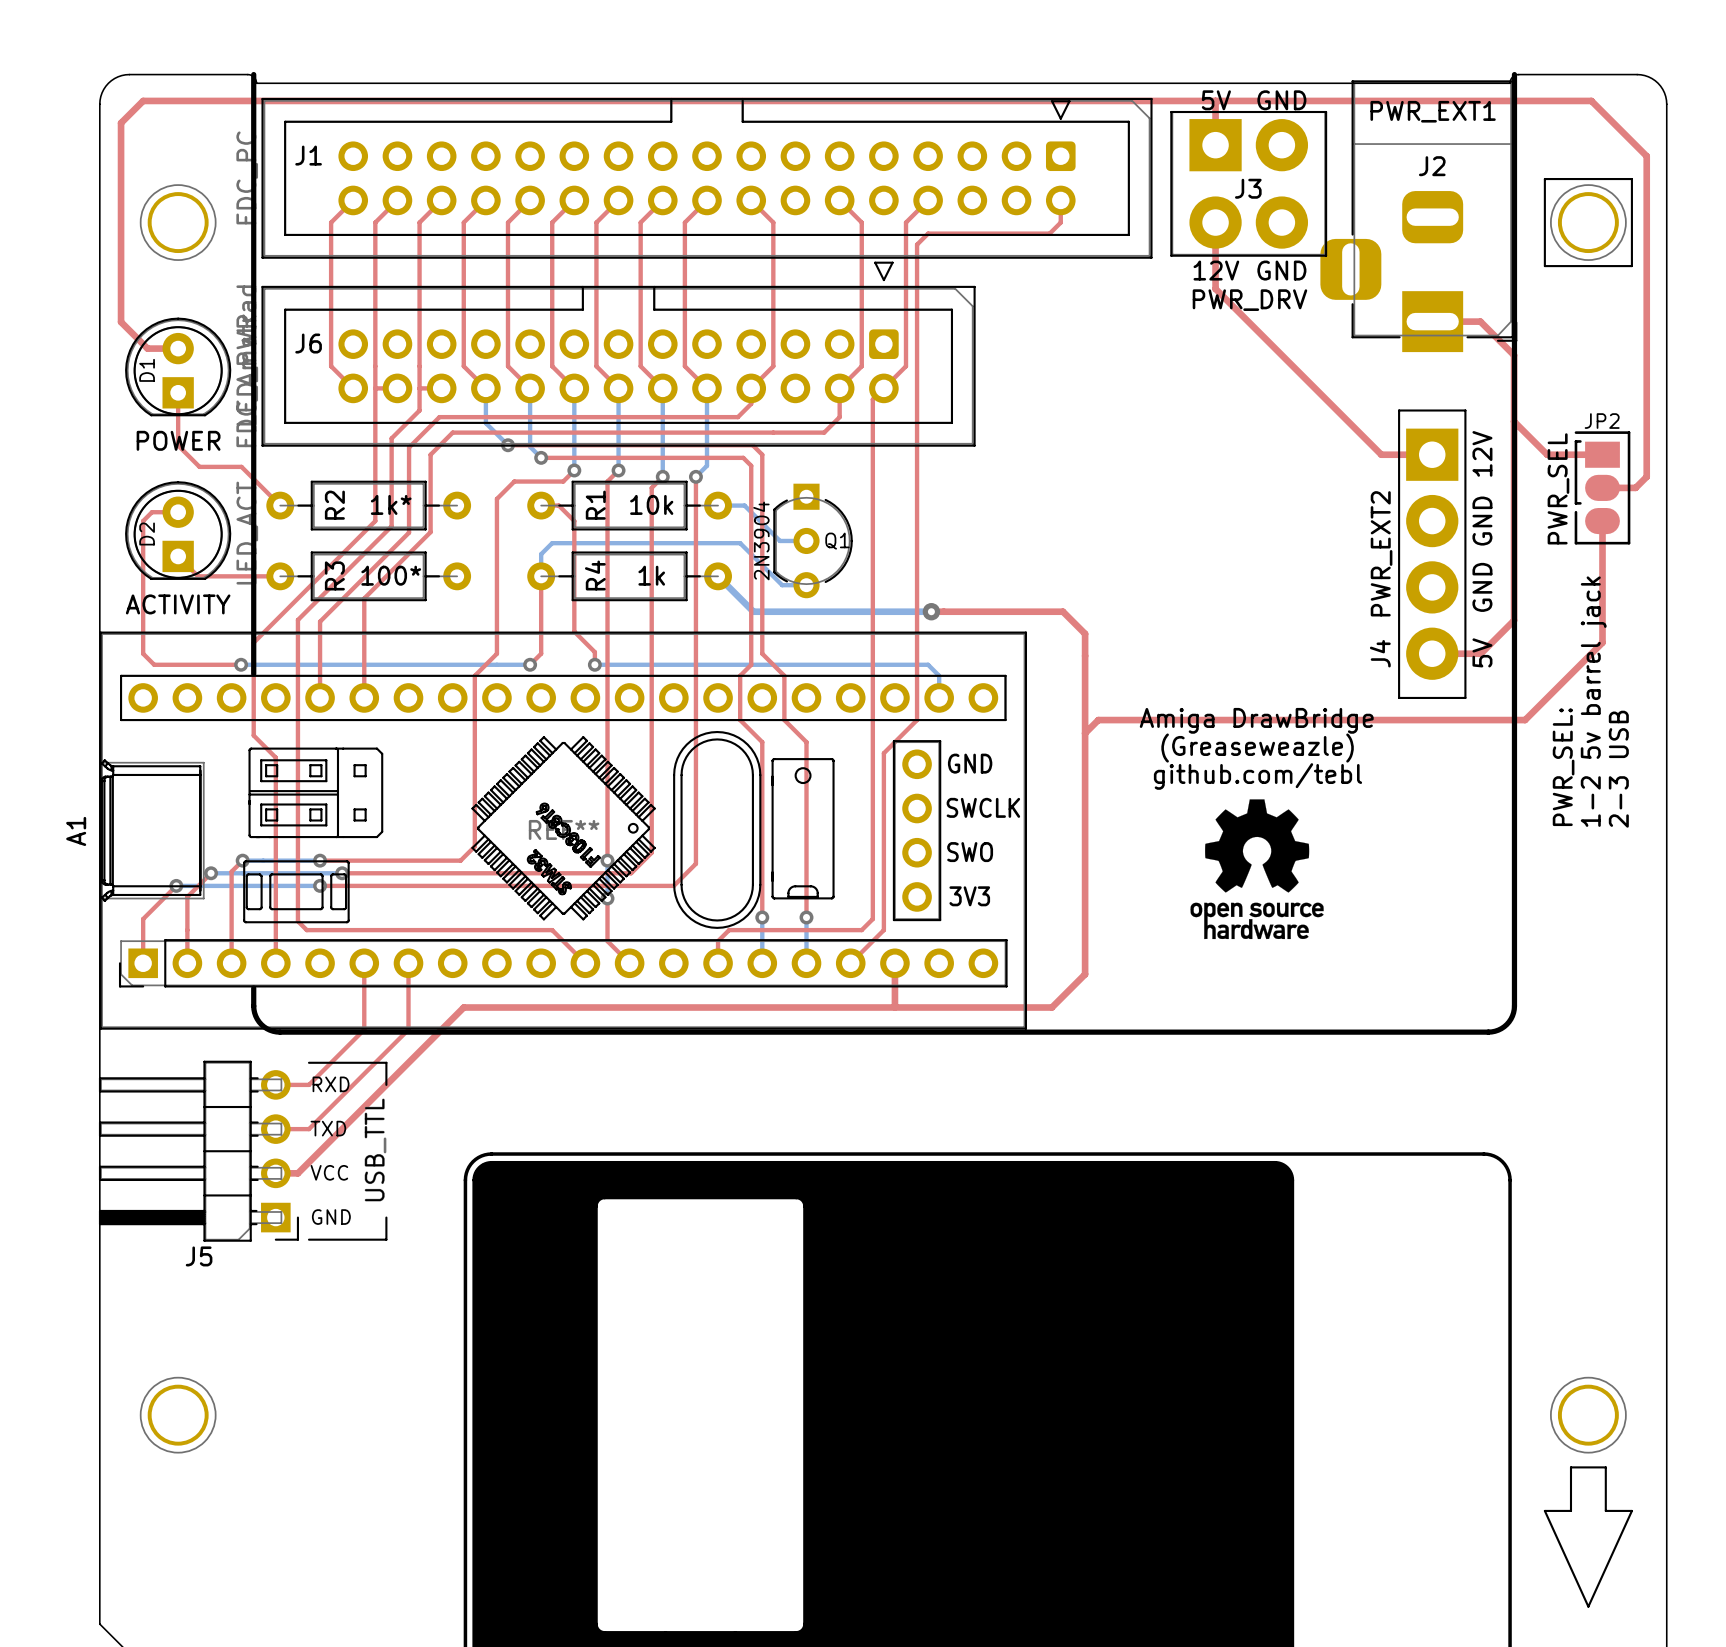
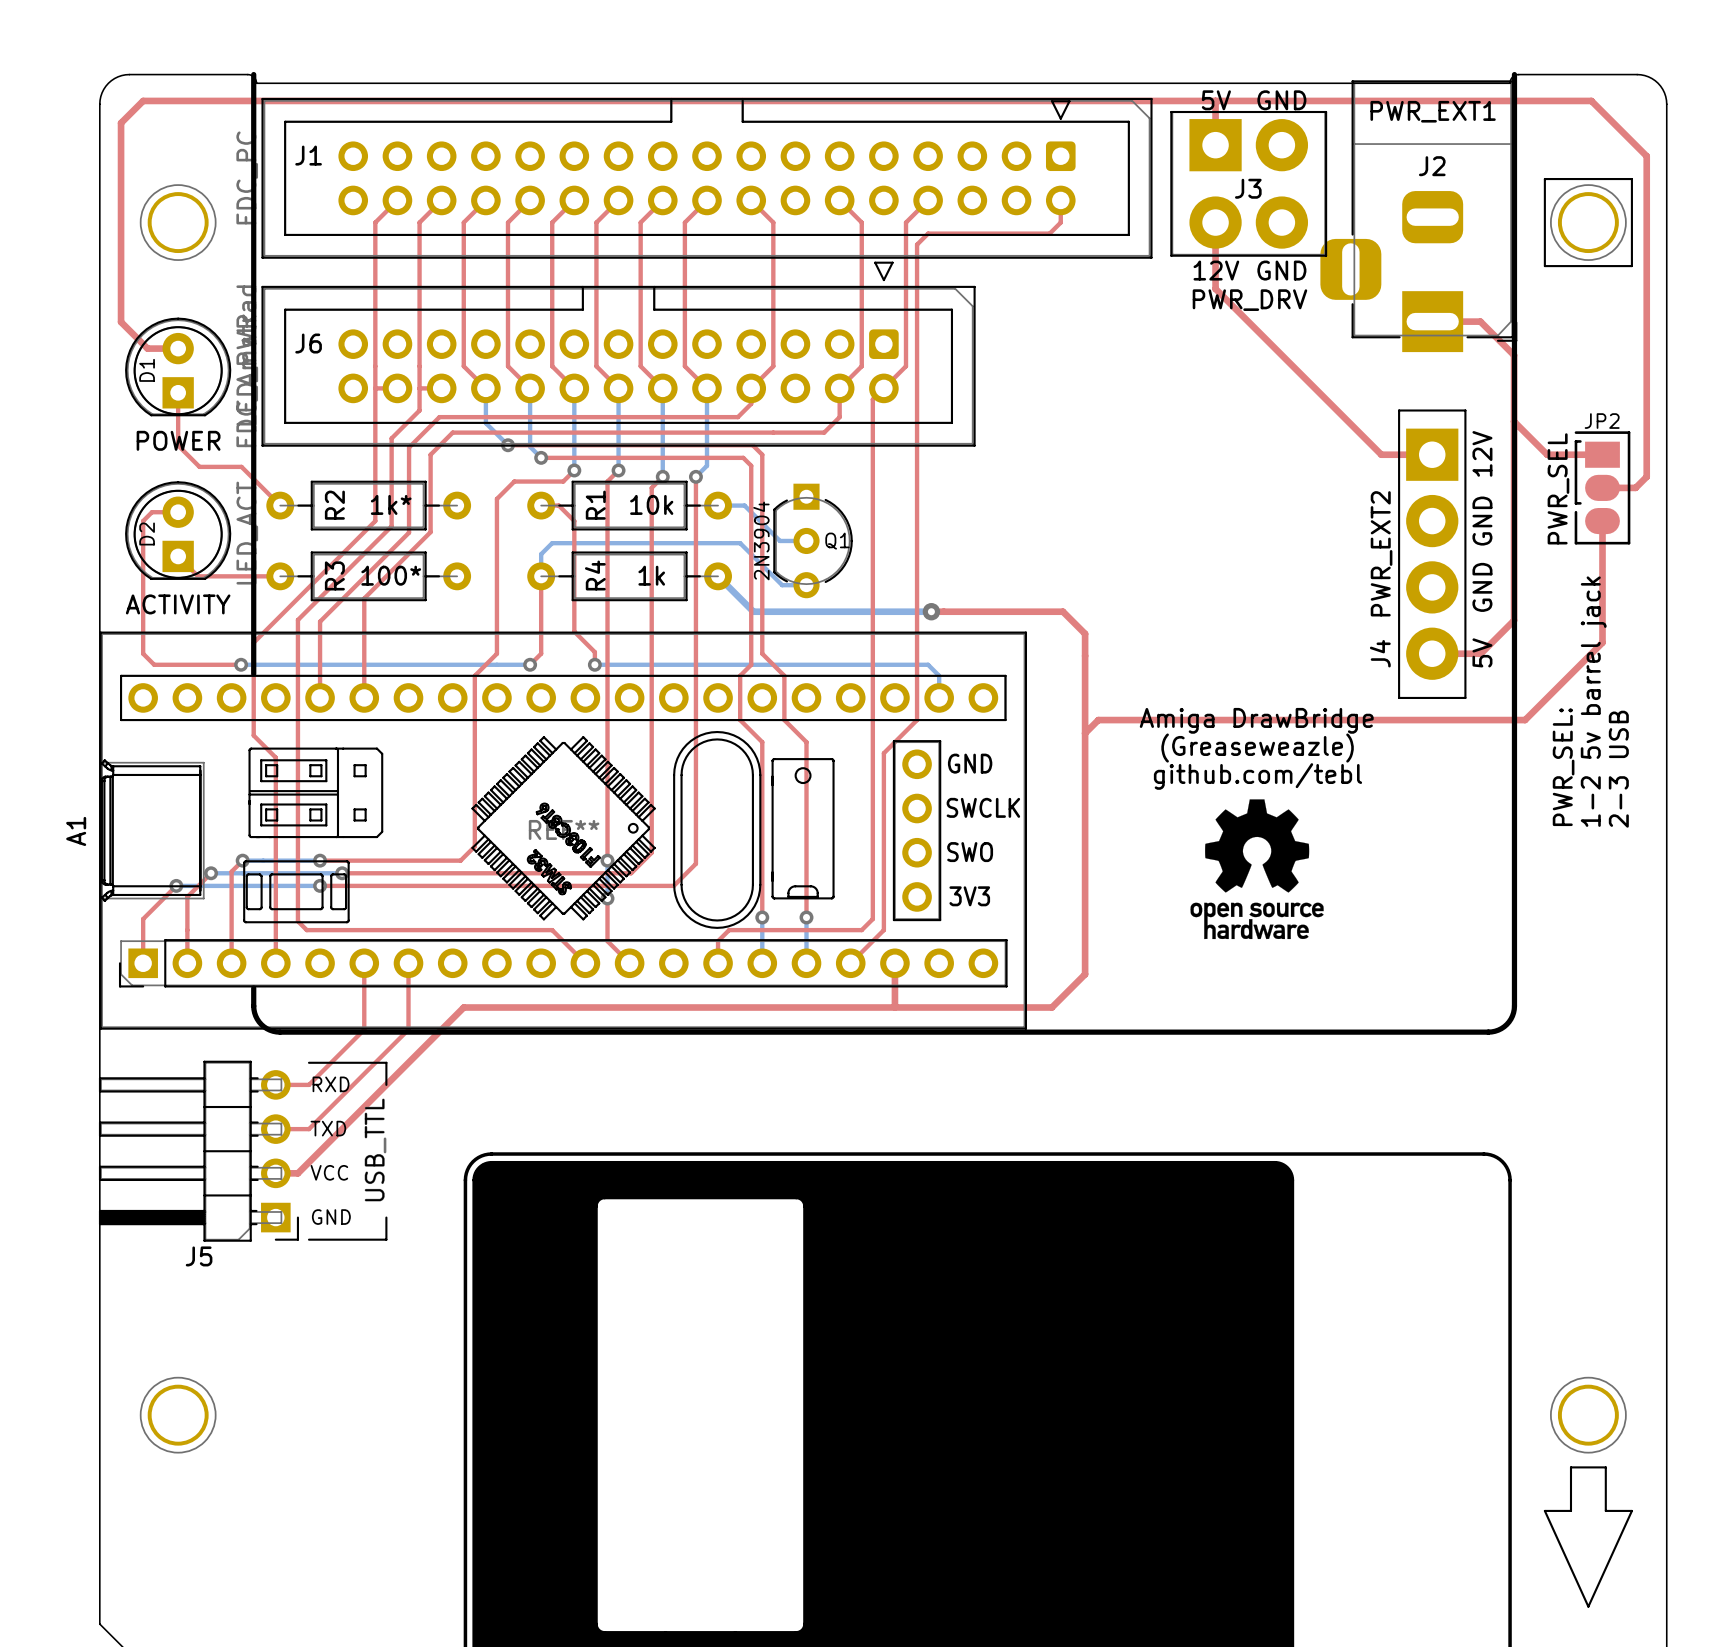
top track: (353, 200) (331, 222) (331, 366) (353, 388) -> none

